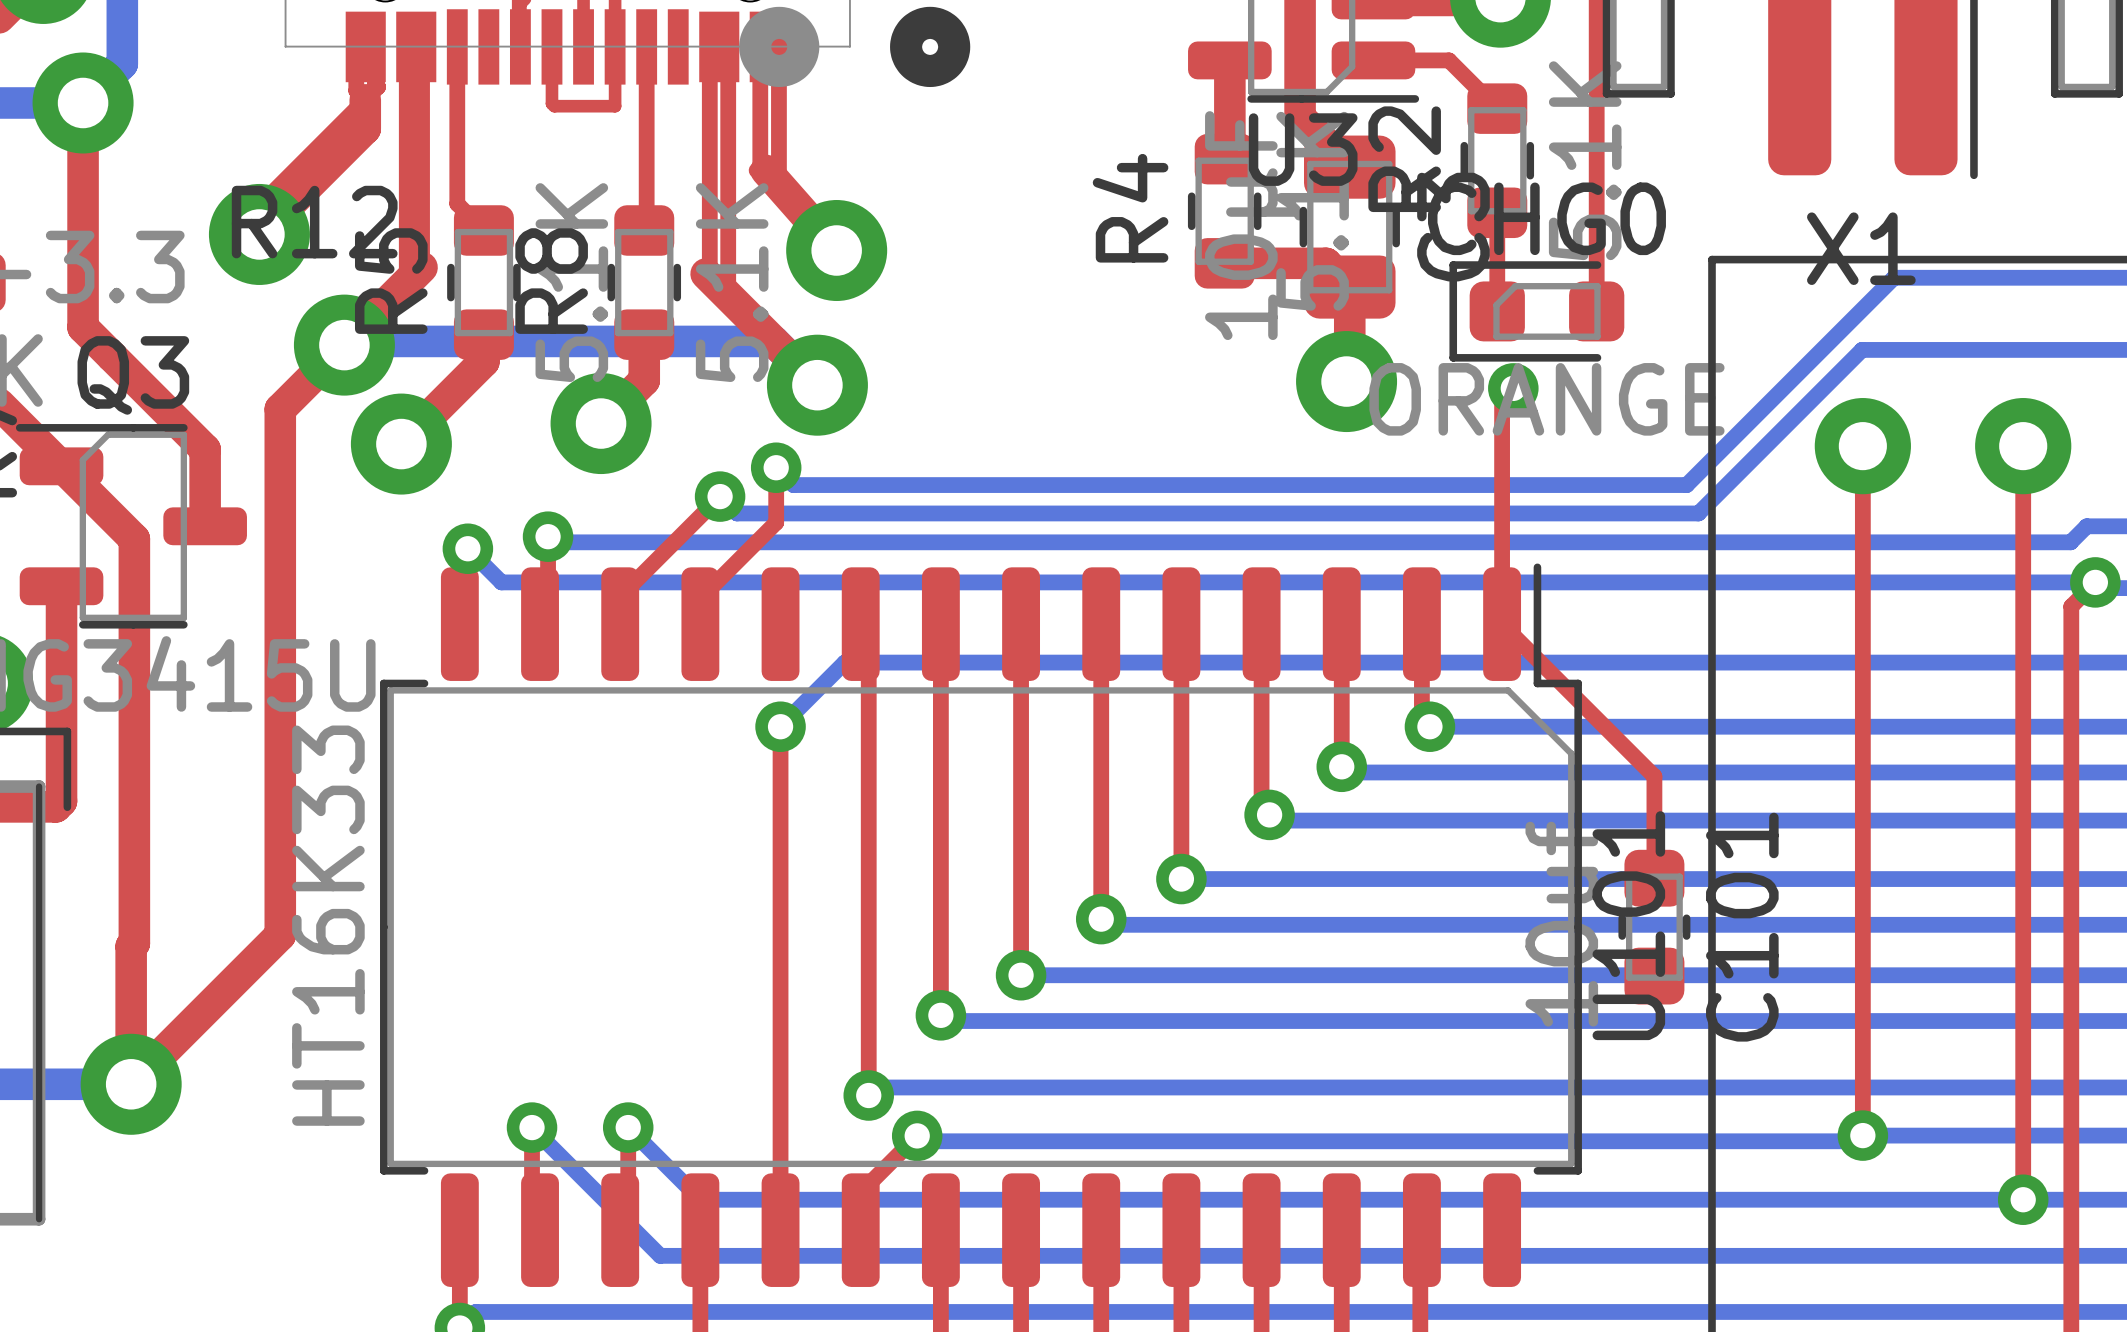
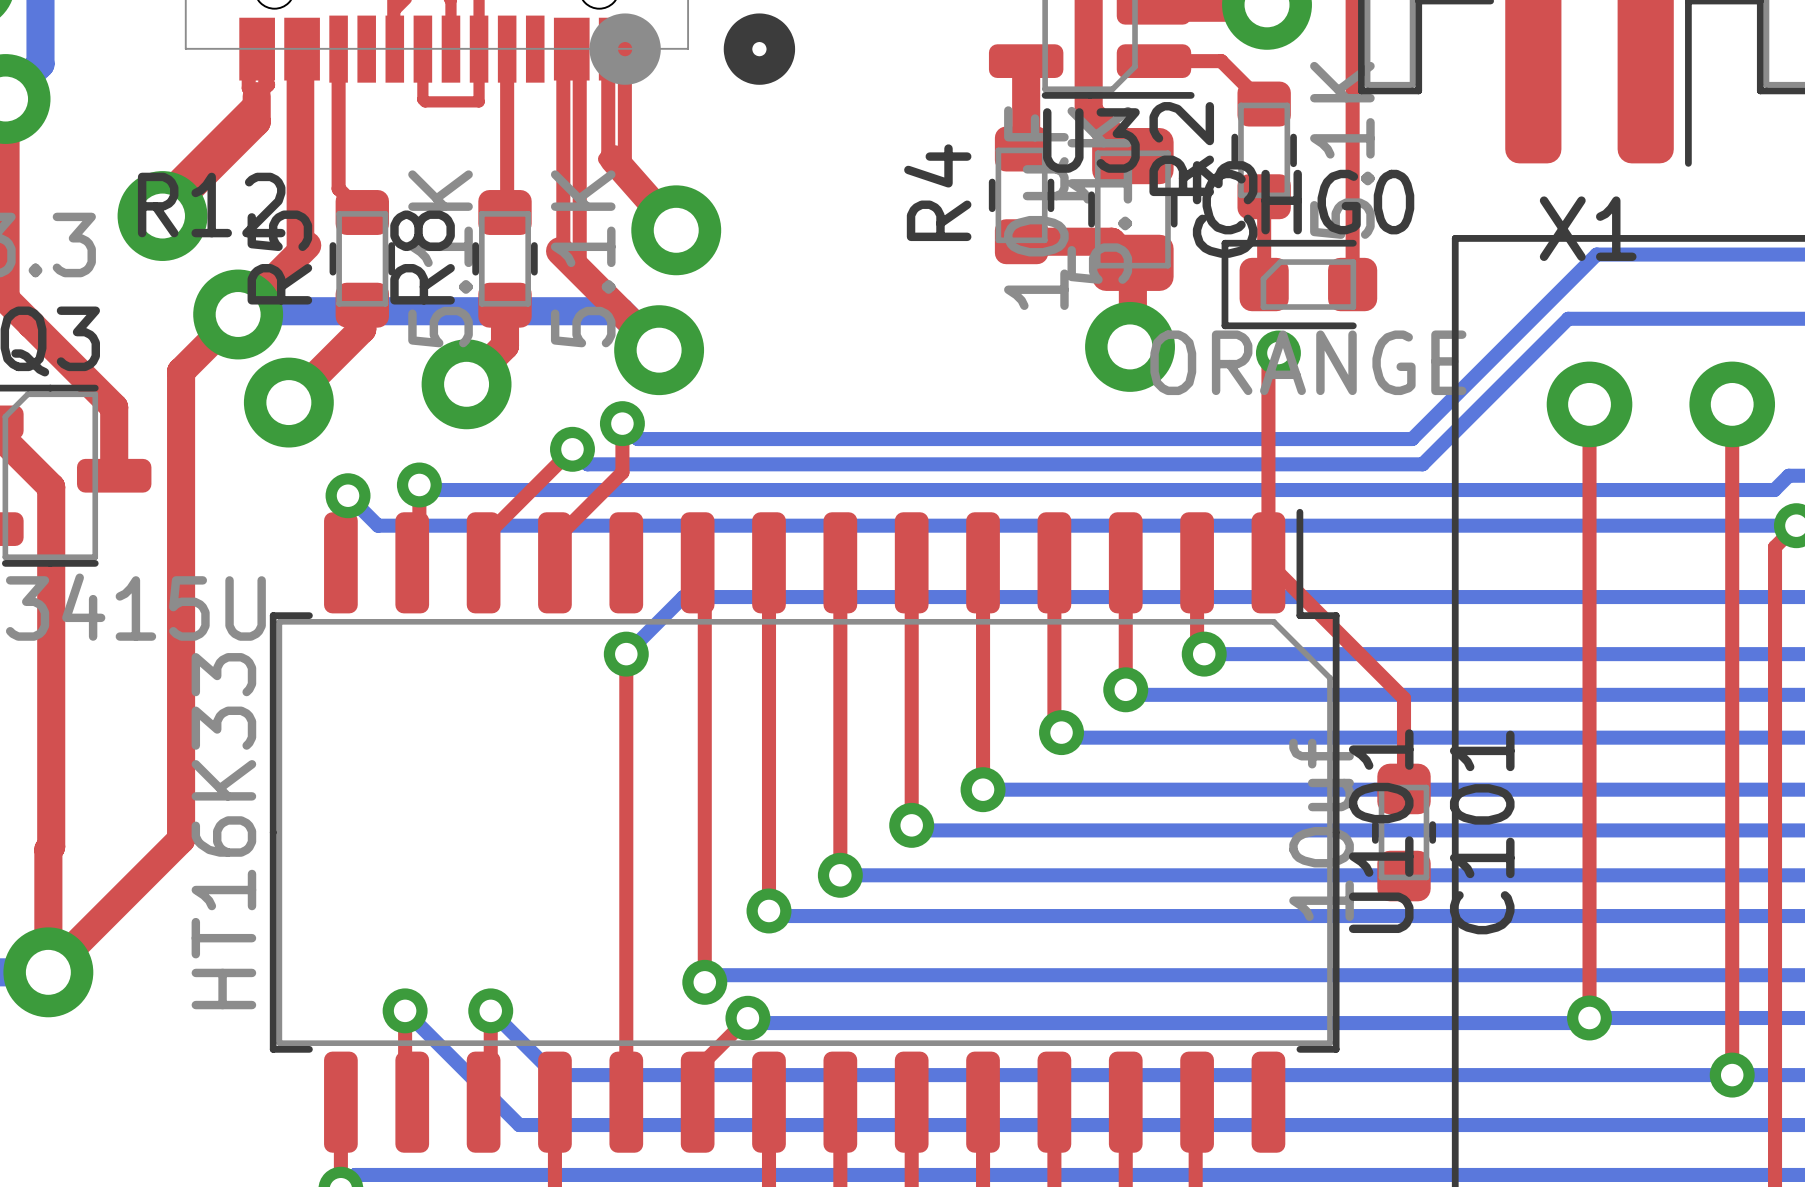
bottom track: (1894, 277) (1686, 485) (1663, 485) -> (1617, 254) (1596, 254) (1412, 439)
bottom track: (1862, 349) (1698, 513) (1675, 513) -> (1588, 318) (1568, 318) (1422, 464)

